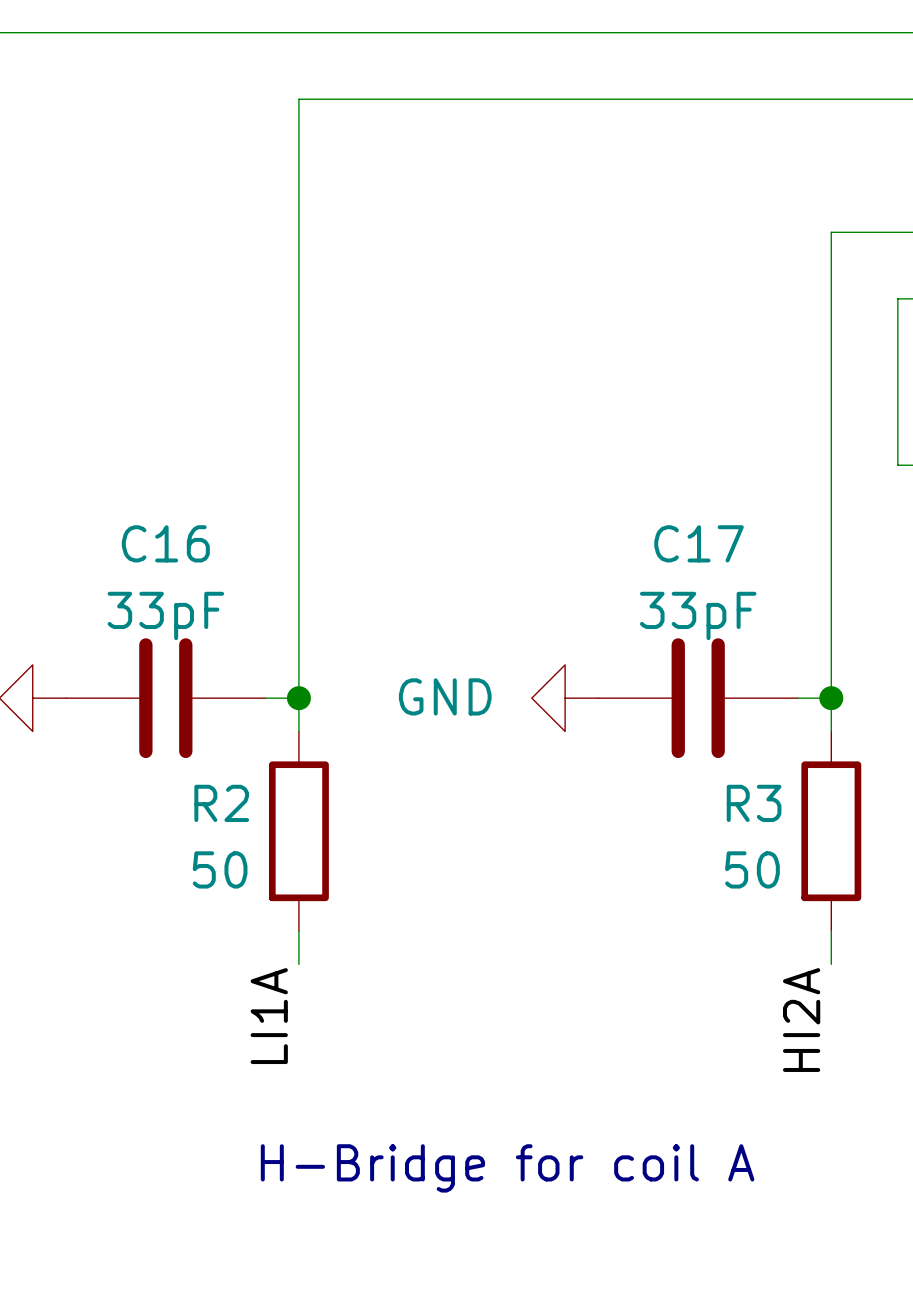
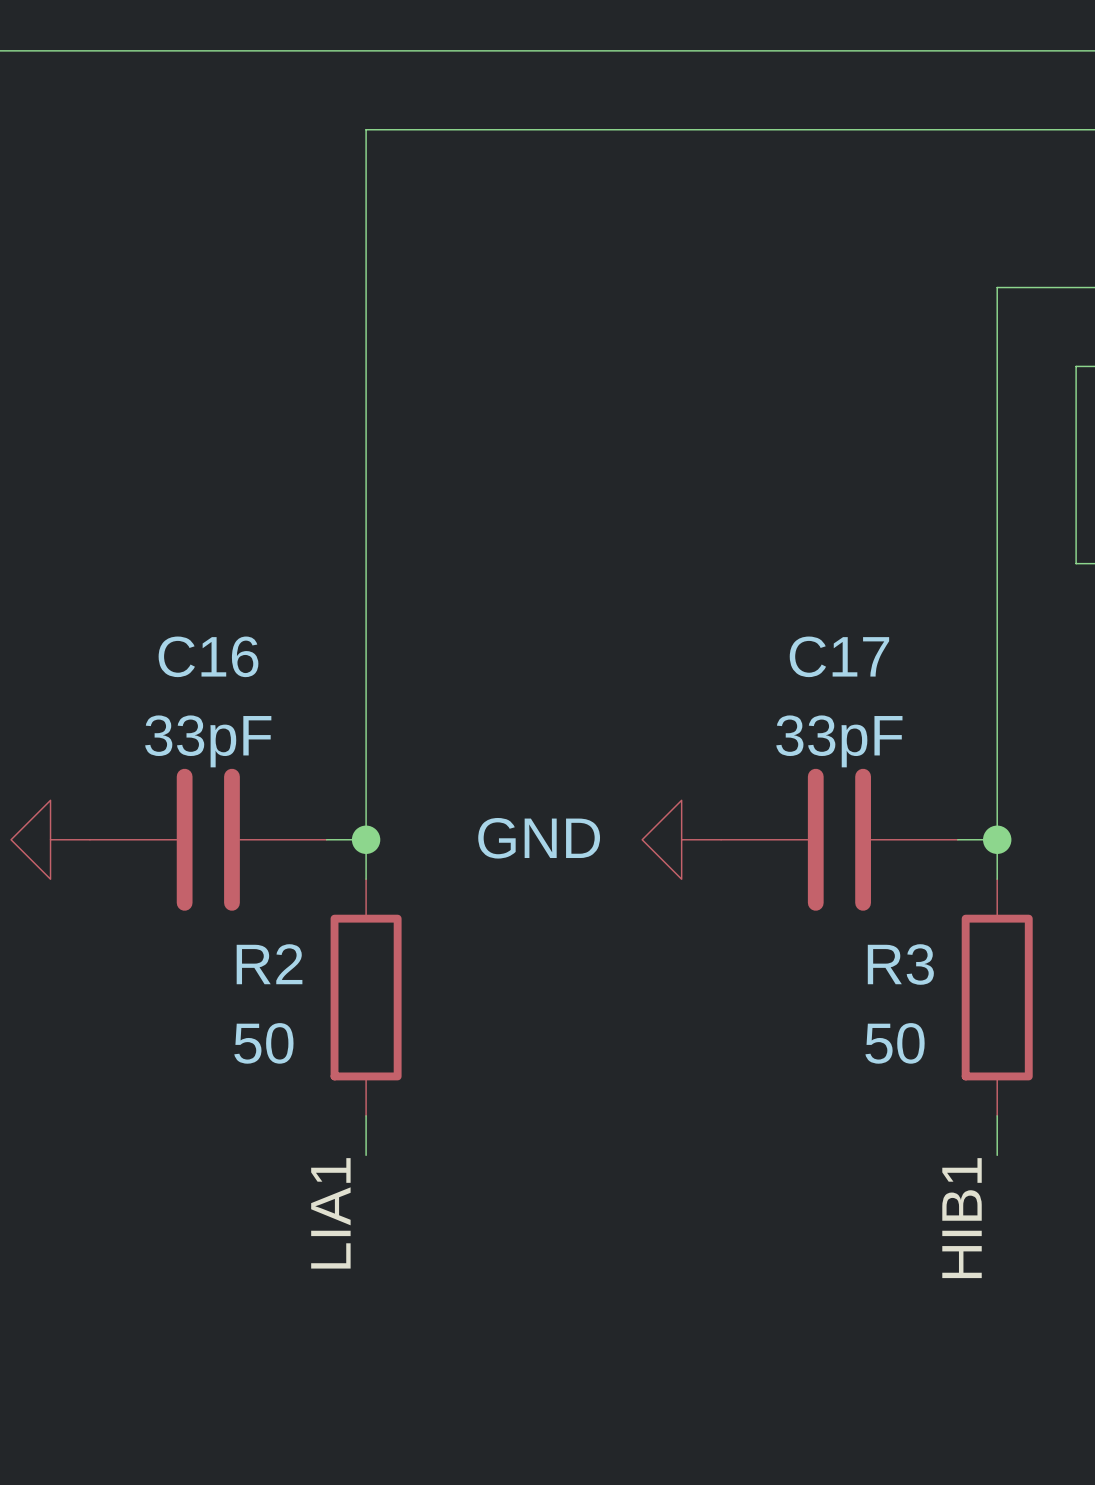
label: LI1A (269, 1016) -> LIA1 (330, 1213)
label: HI2A (801, 1020) -> HIB1 (962, 1218)
text: H-Bridge for coil A (507, 1168) -> none

